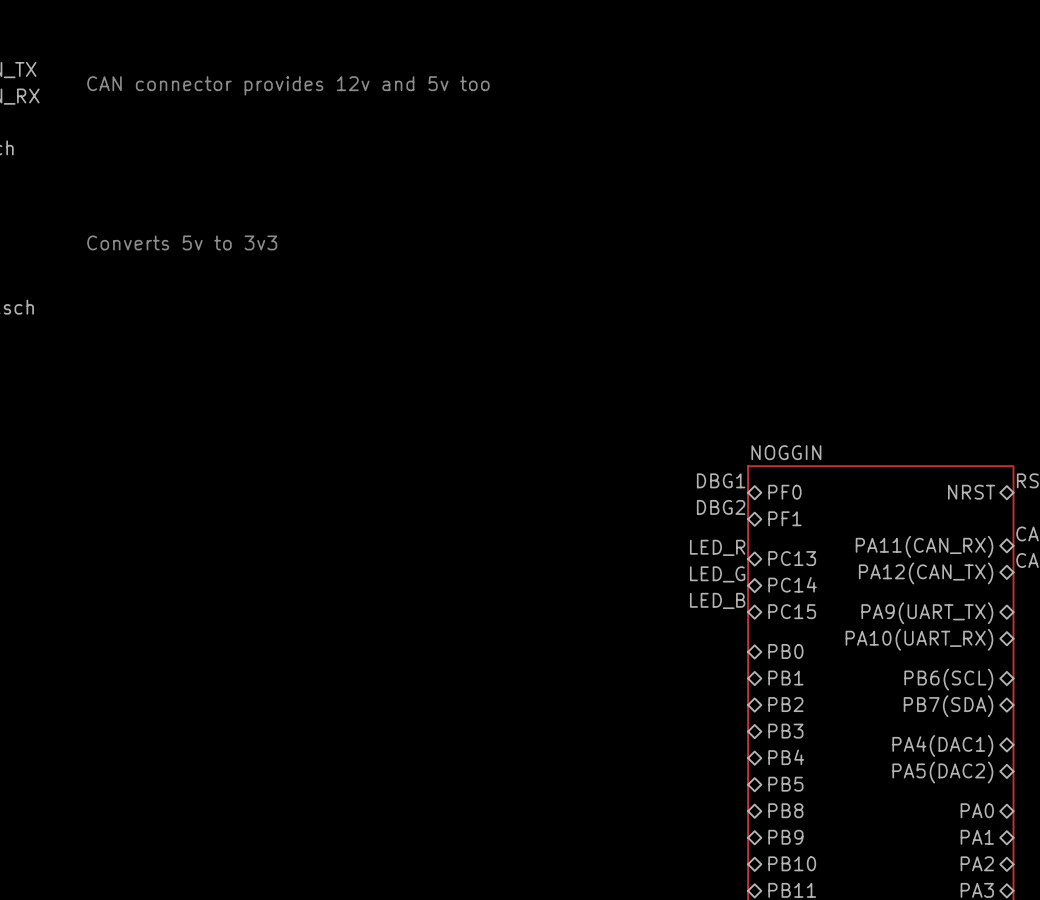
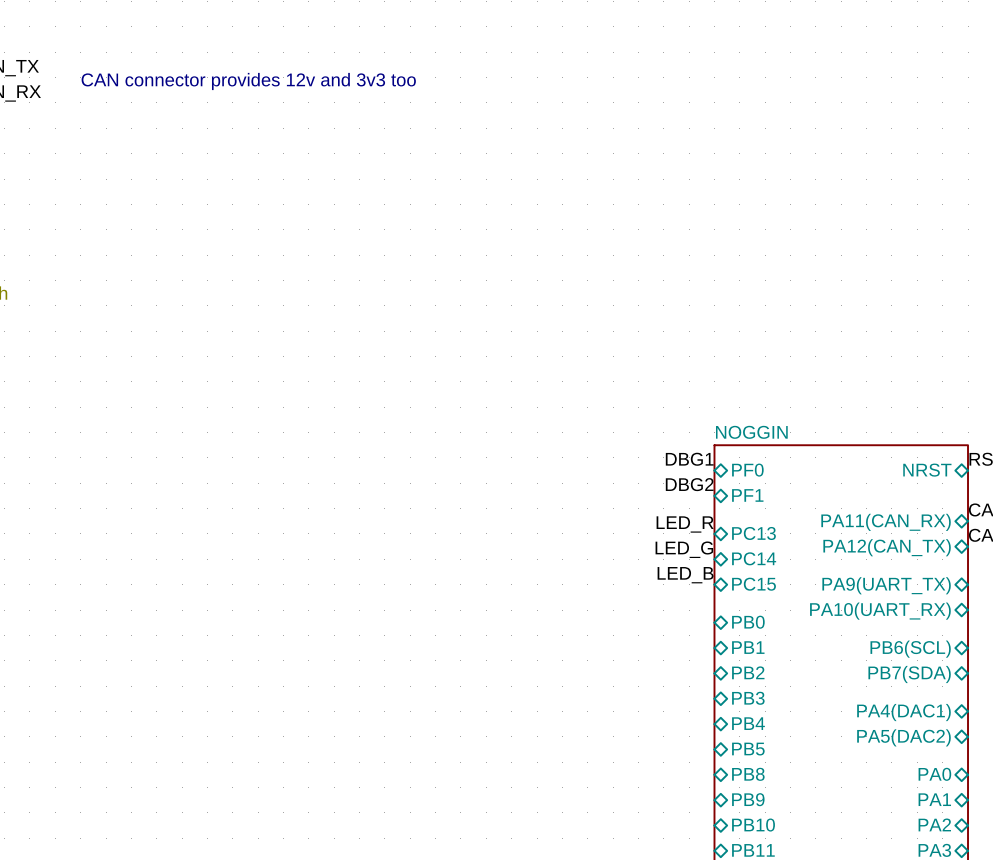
text: CAN connector provides 12v and 5v too (288, 85) -> CAN connector provides 12v and 3v3 too (248, 81)
text: Converts 5v to 3v3 (182, 242) -> none

